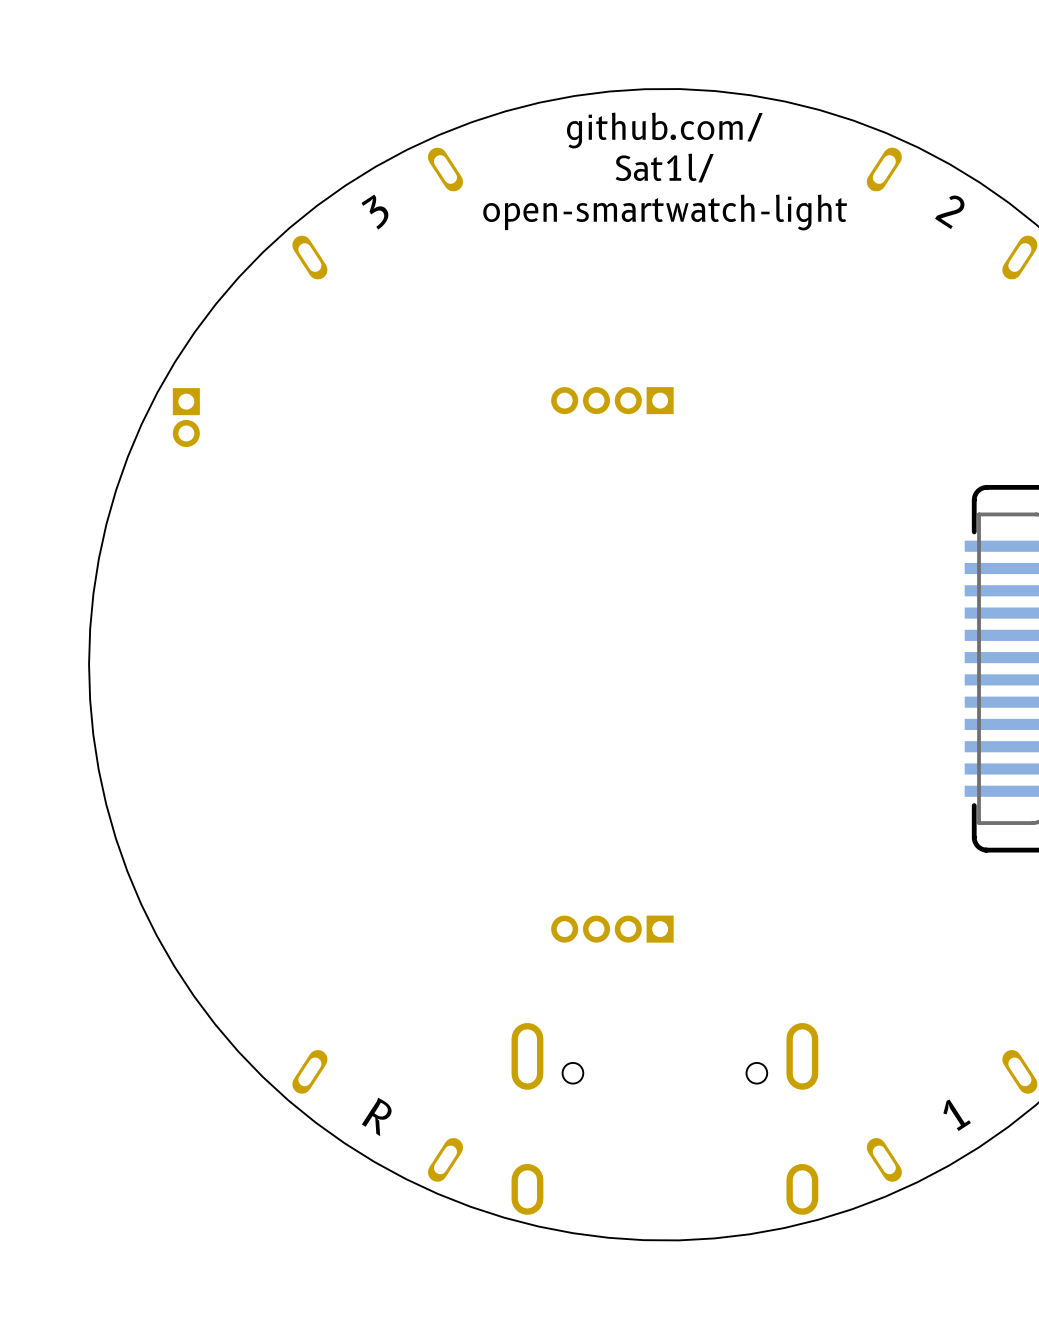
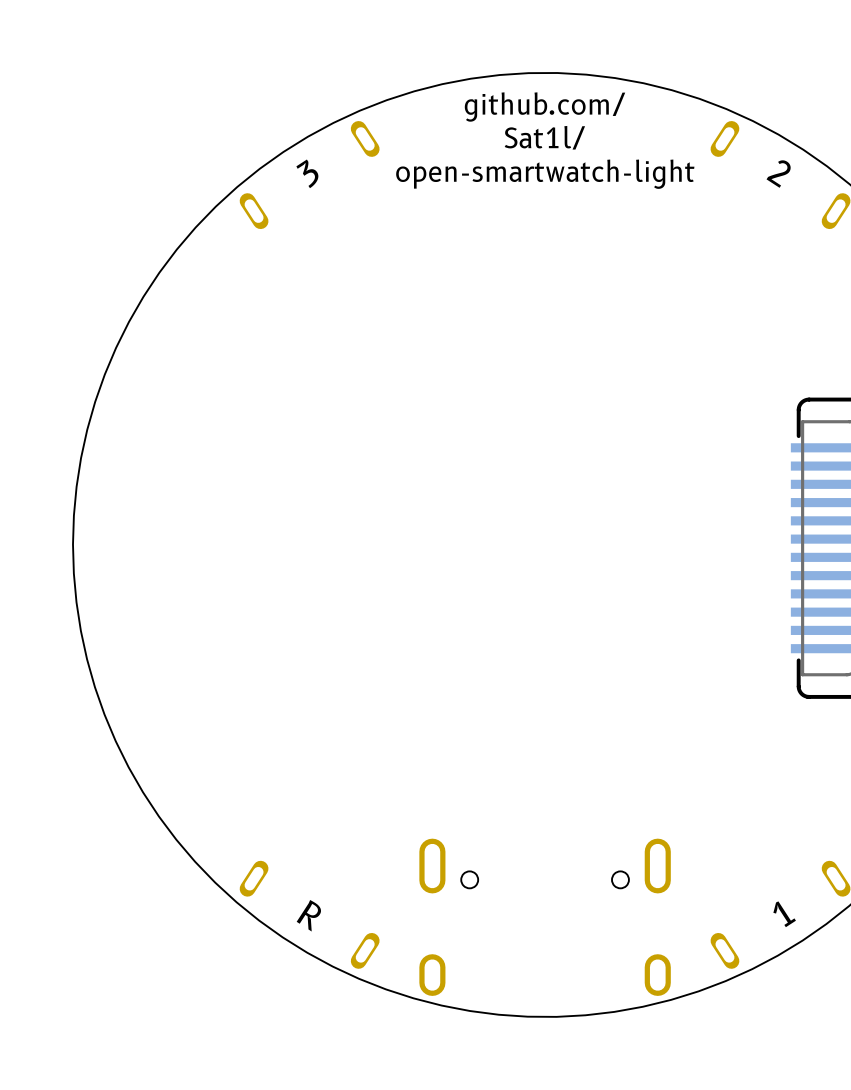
part: (612, 400) -> none
part: (186, 417) -> none
part: (612, 929) -> none

